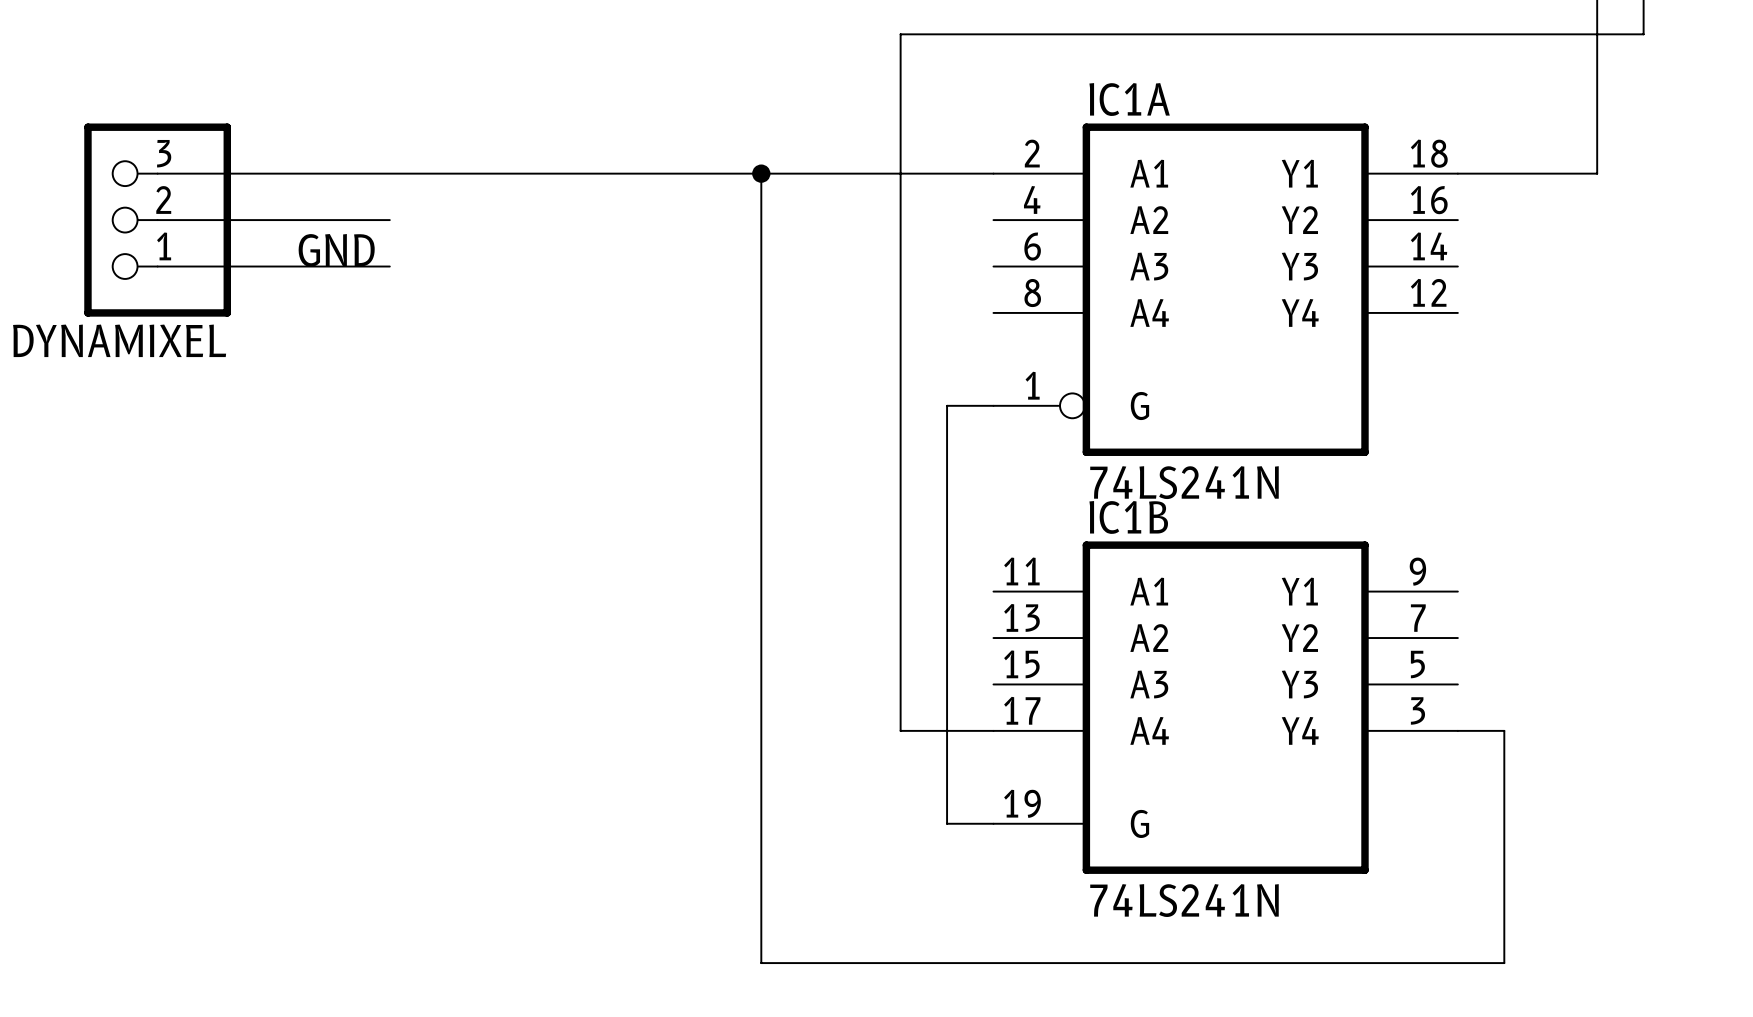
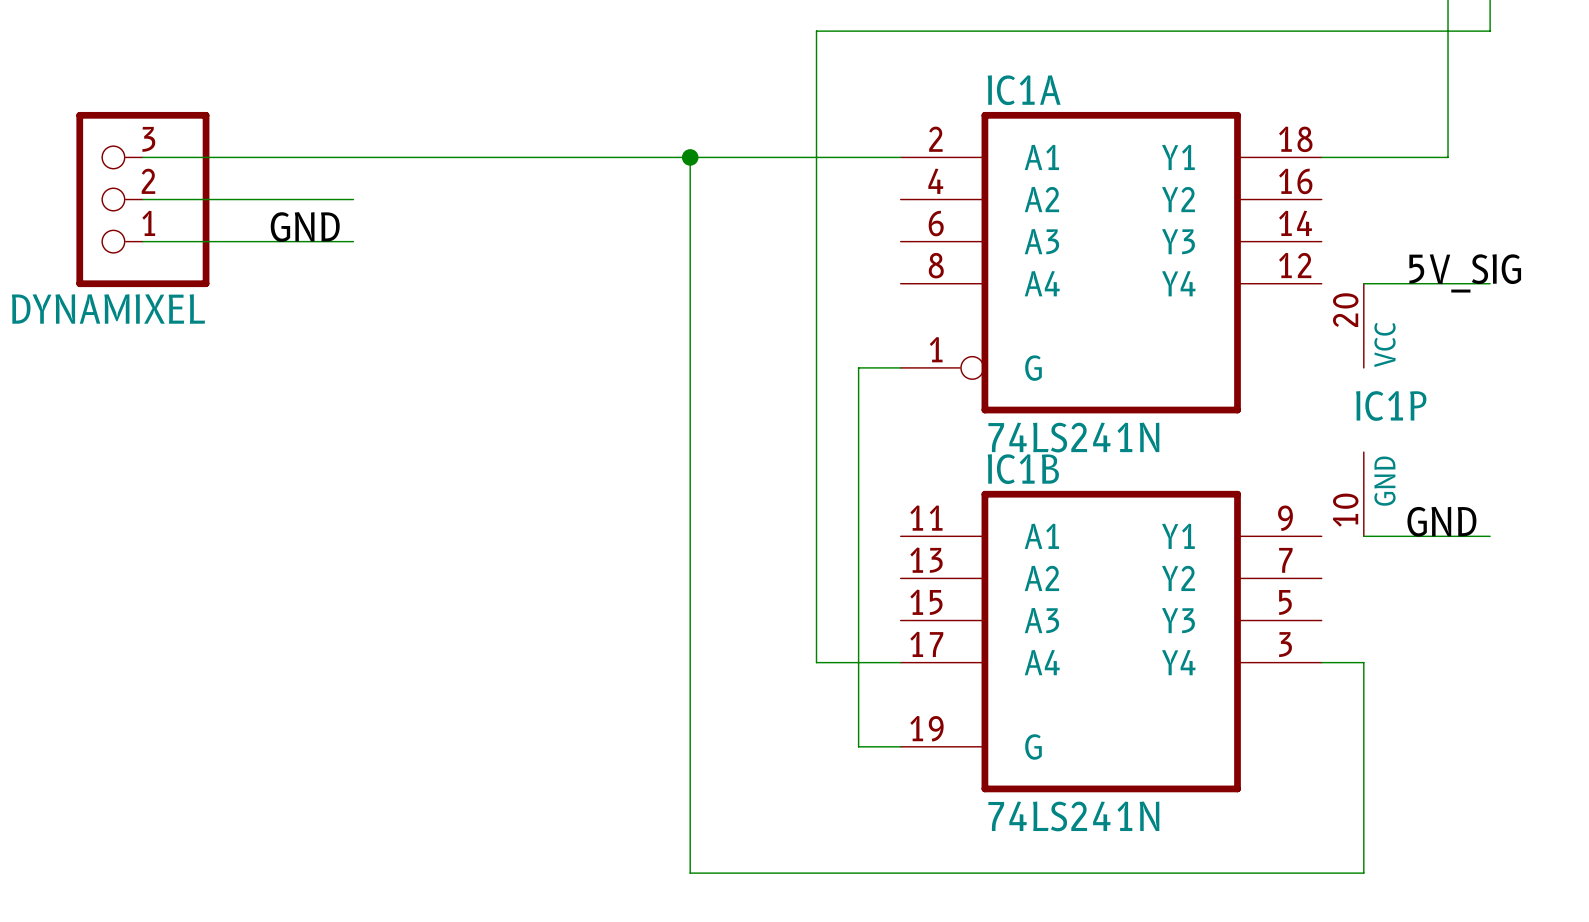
label: none -> 5V_SIG (1465, 273)
wire: none -> (1363, 283) (1490, 283)
IC1P: none -> (1363, 410)
label: none -> GND (1441, 521)
wire: none -> (1363, 536) (1490, 536)

